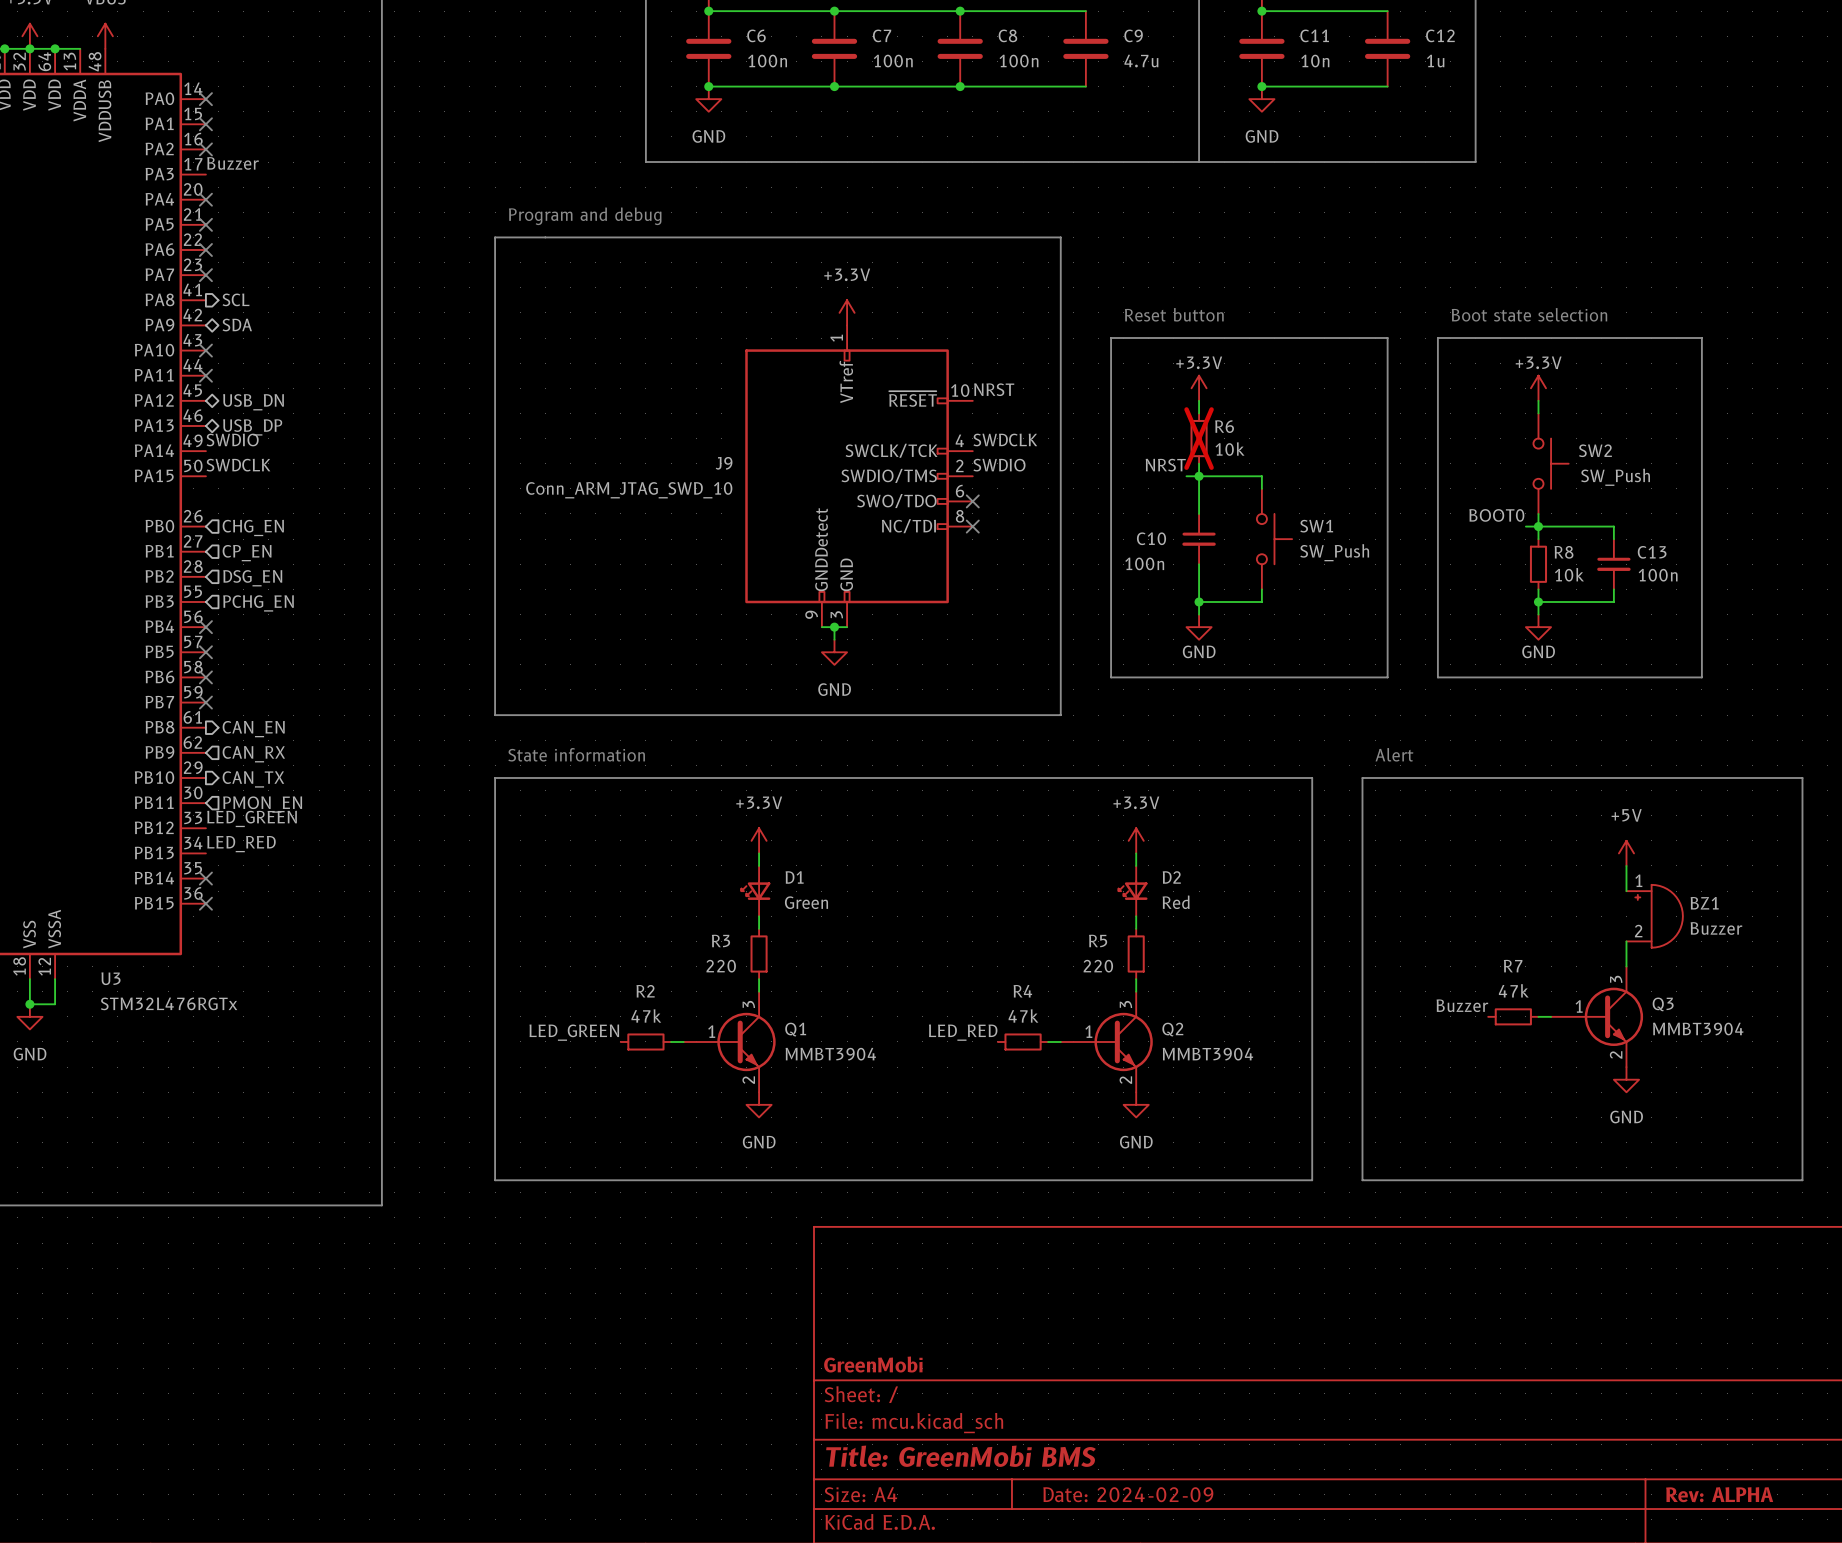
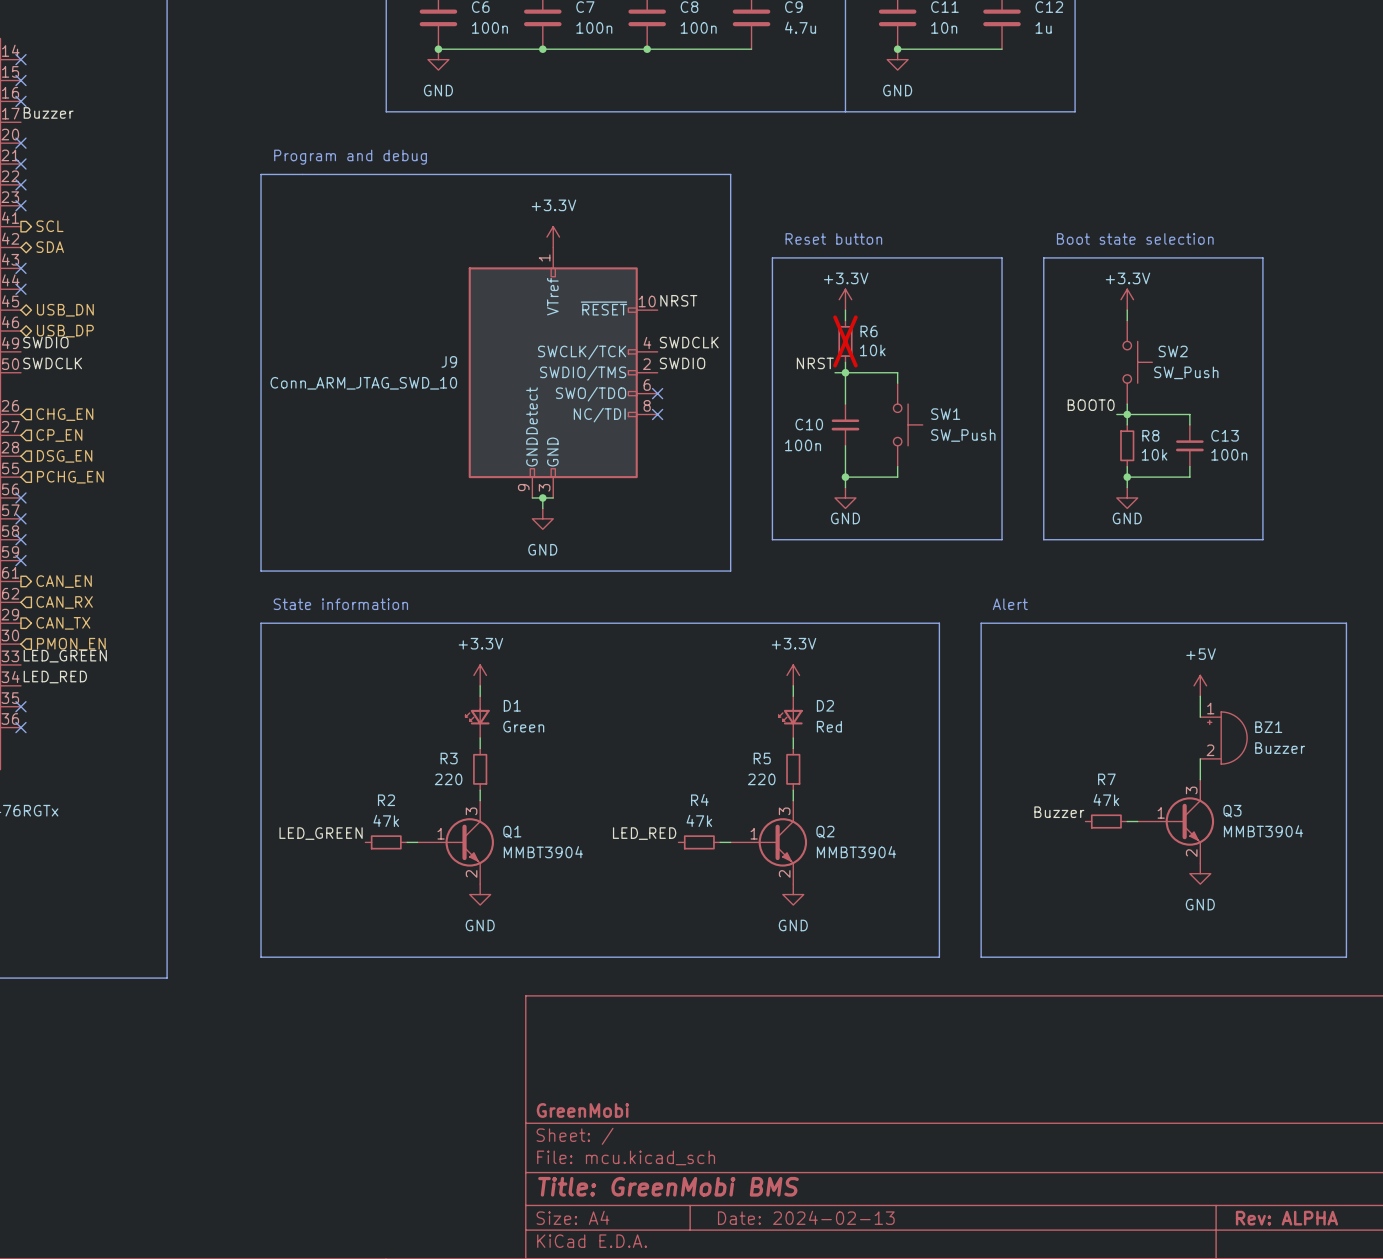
title block: Date: 2024-02-09 (1128, 1494) -> Date: 2024-02-13 (806, 1217)

